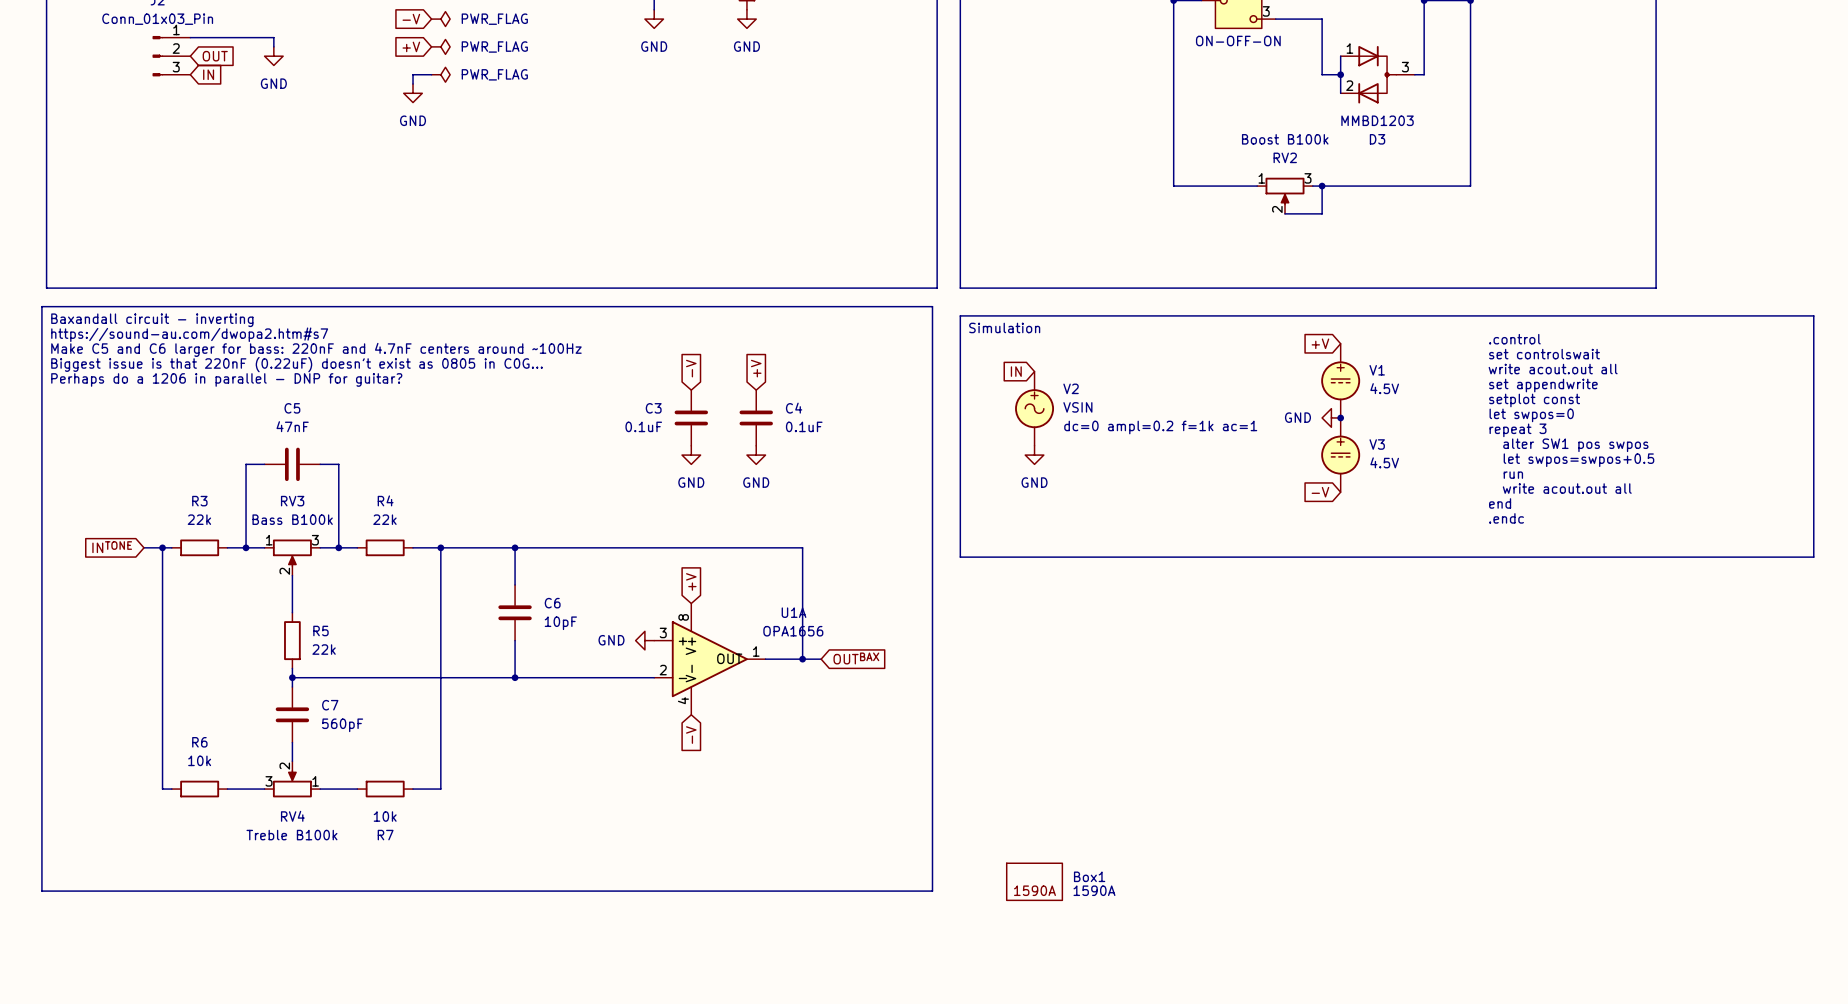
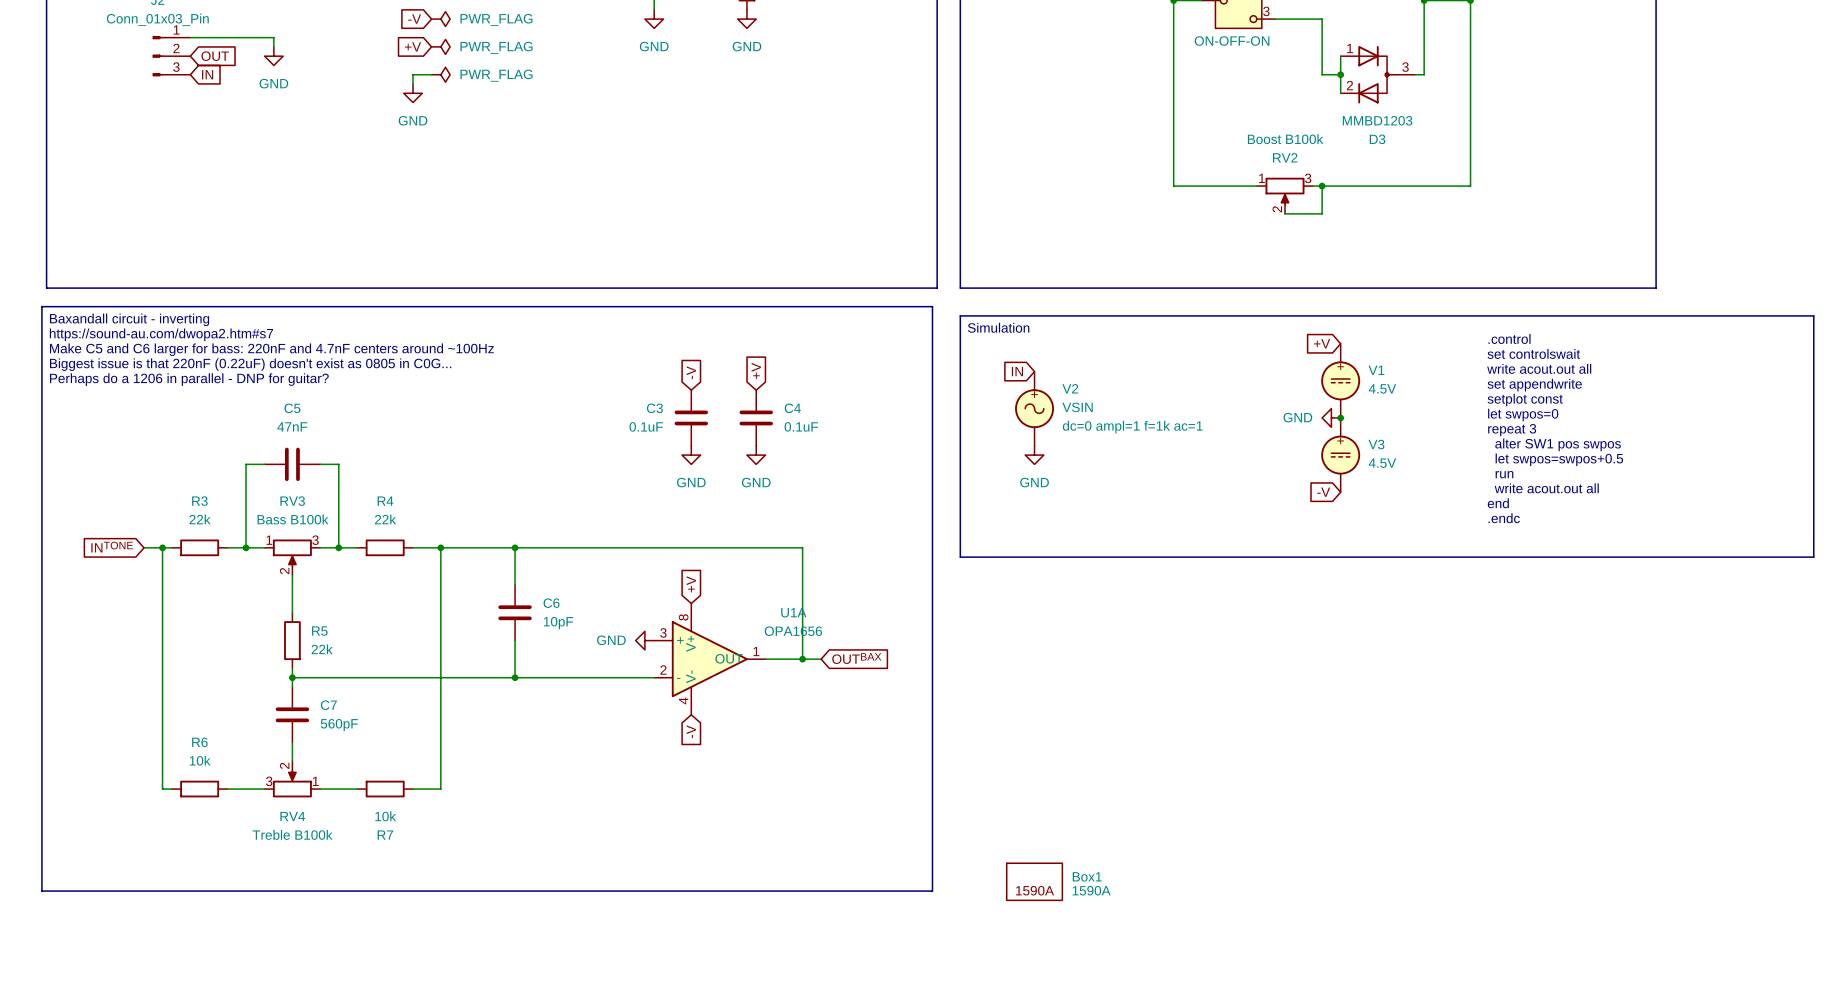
V2 text: dc=0 ampl=0.2 f=1k ac=1 (1160, 427) -> dc=0 ampl=1 f=1k ac=1 (1132, 427)

